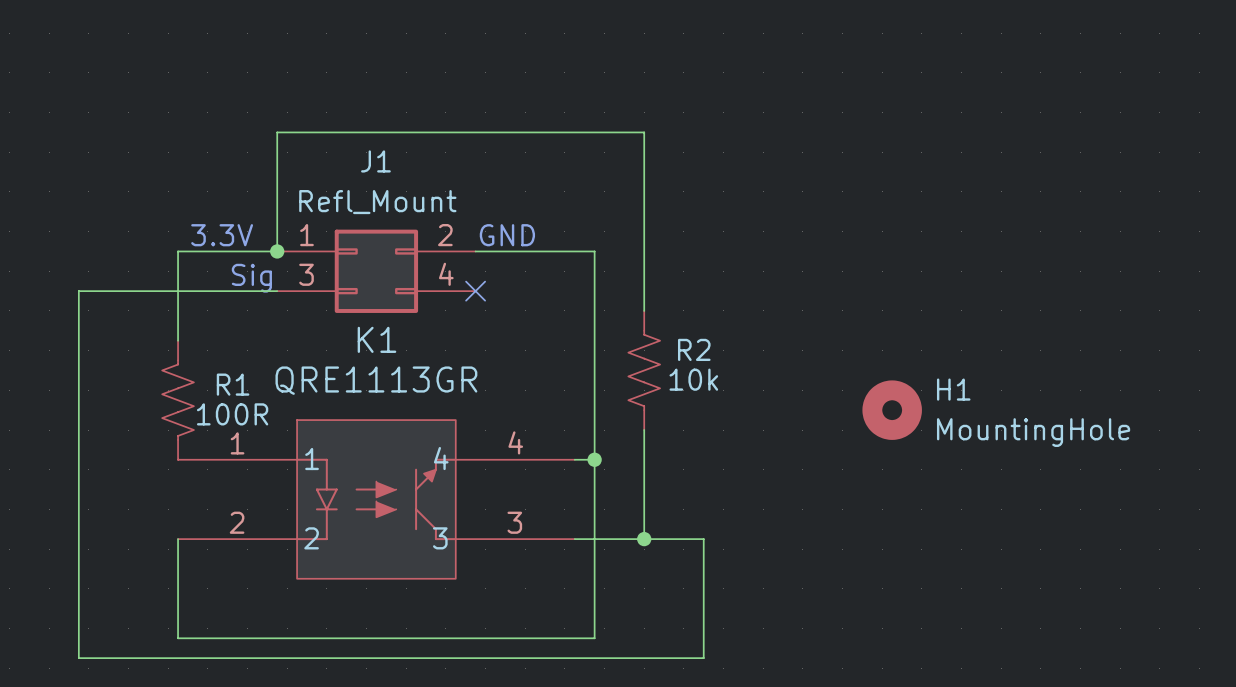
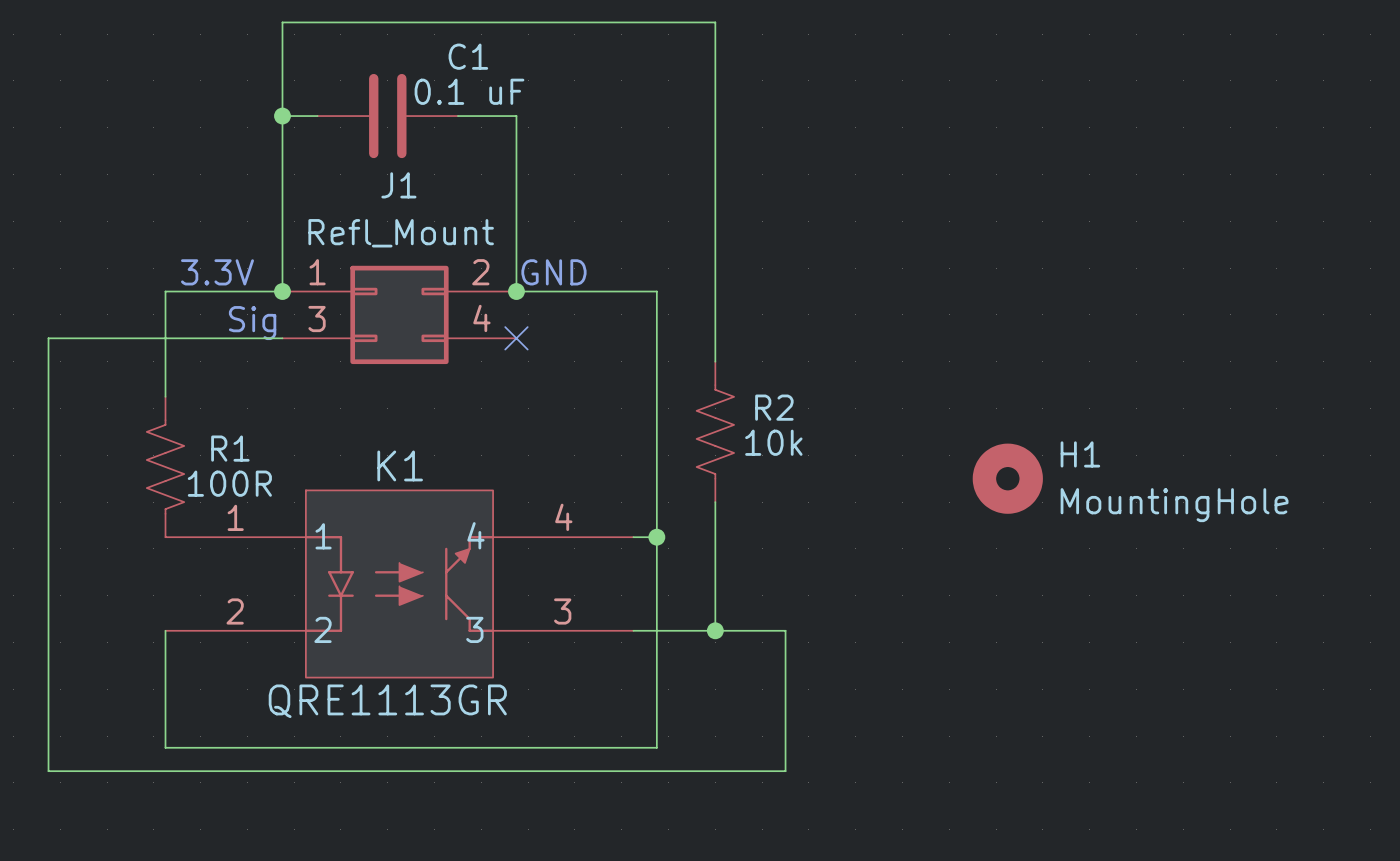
wire: none -> (282, 116) (317, 116)
junction: none -> (282, 116)
C1: none -> 0.1 uF (387, 116)
wire: none -> (457, 116) (516, 116) (516, 291)
wire: (277, 132) (644, 132) -> (282, 151) (282, 22) (715, 22) (715, 151)
junction: none -> (516, 291)
K1 name position: K1 (376, 339) -> K1 (400, 465)
K1 value position: QRE1113GR (376, 380) -> QRE1113GR (387, 701)

